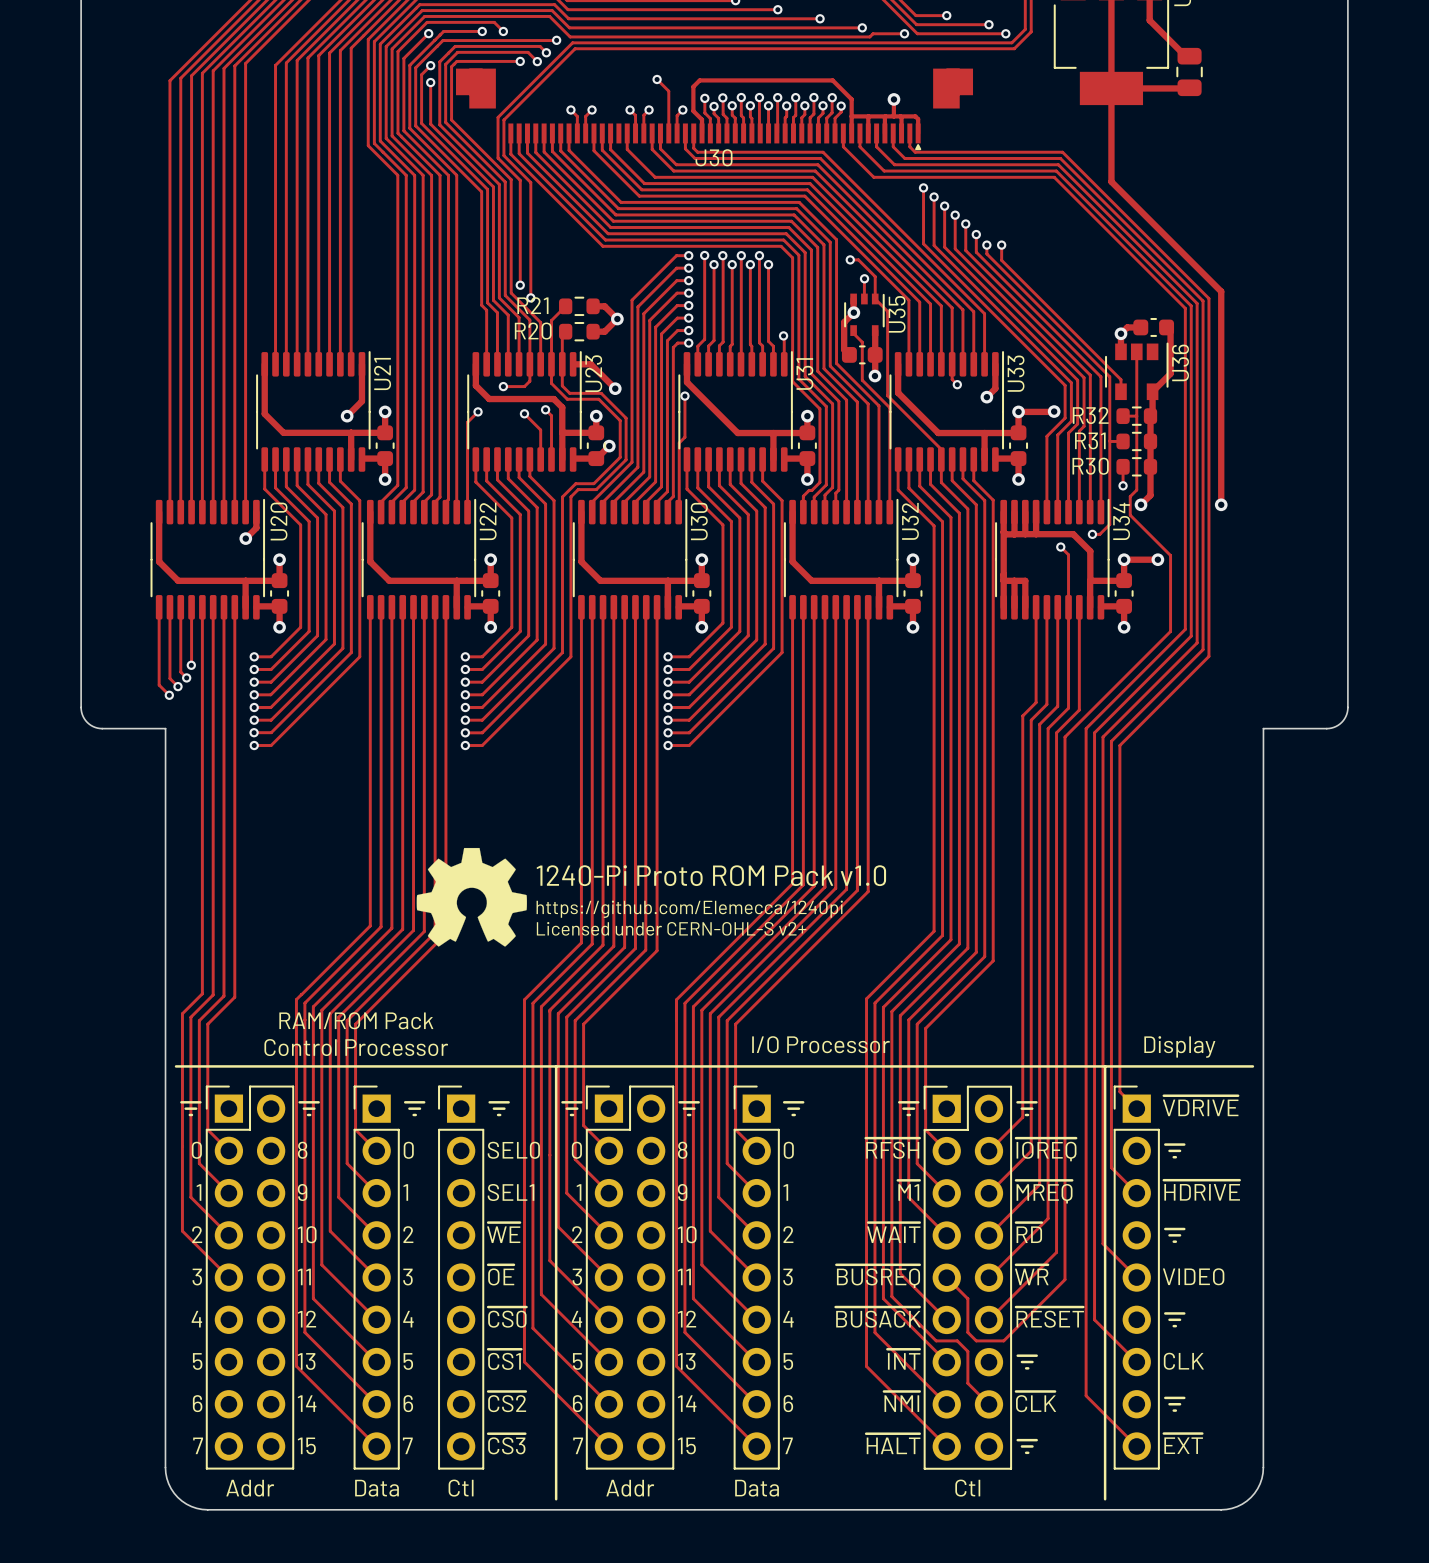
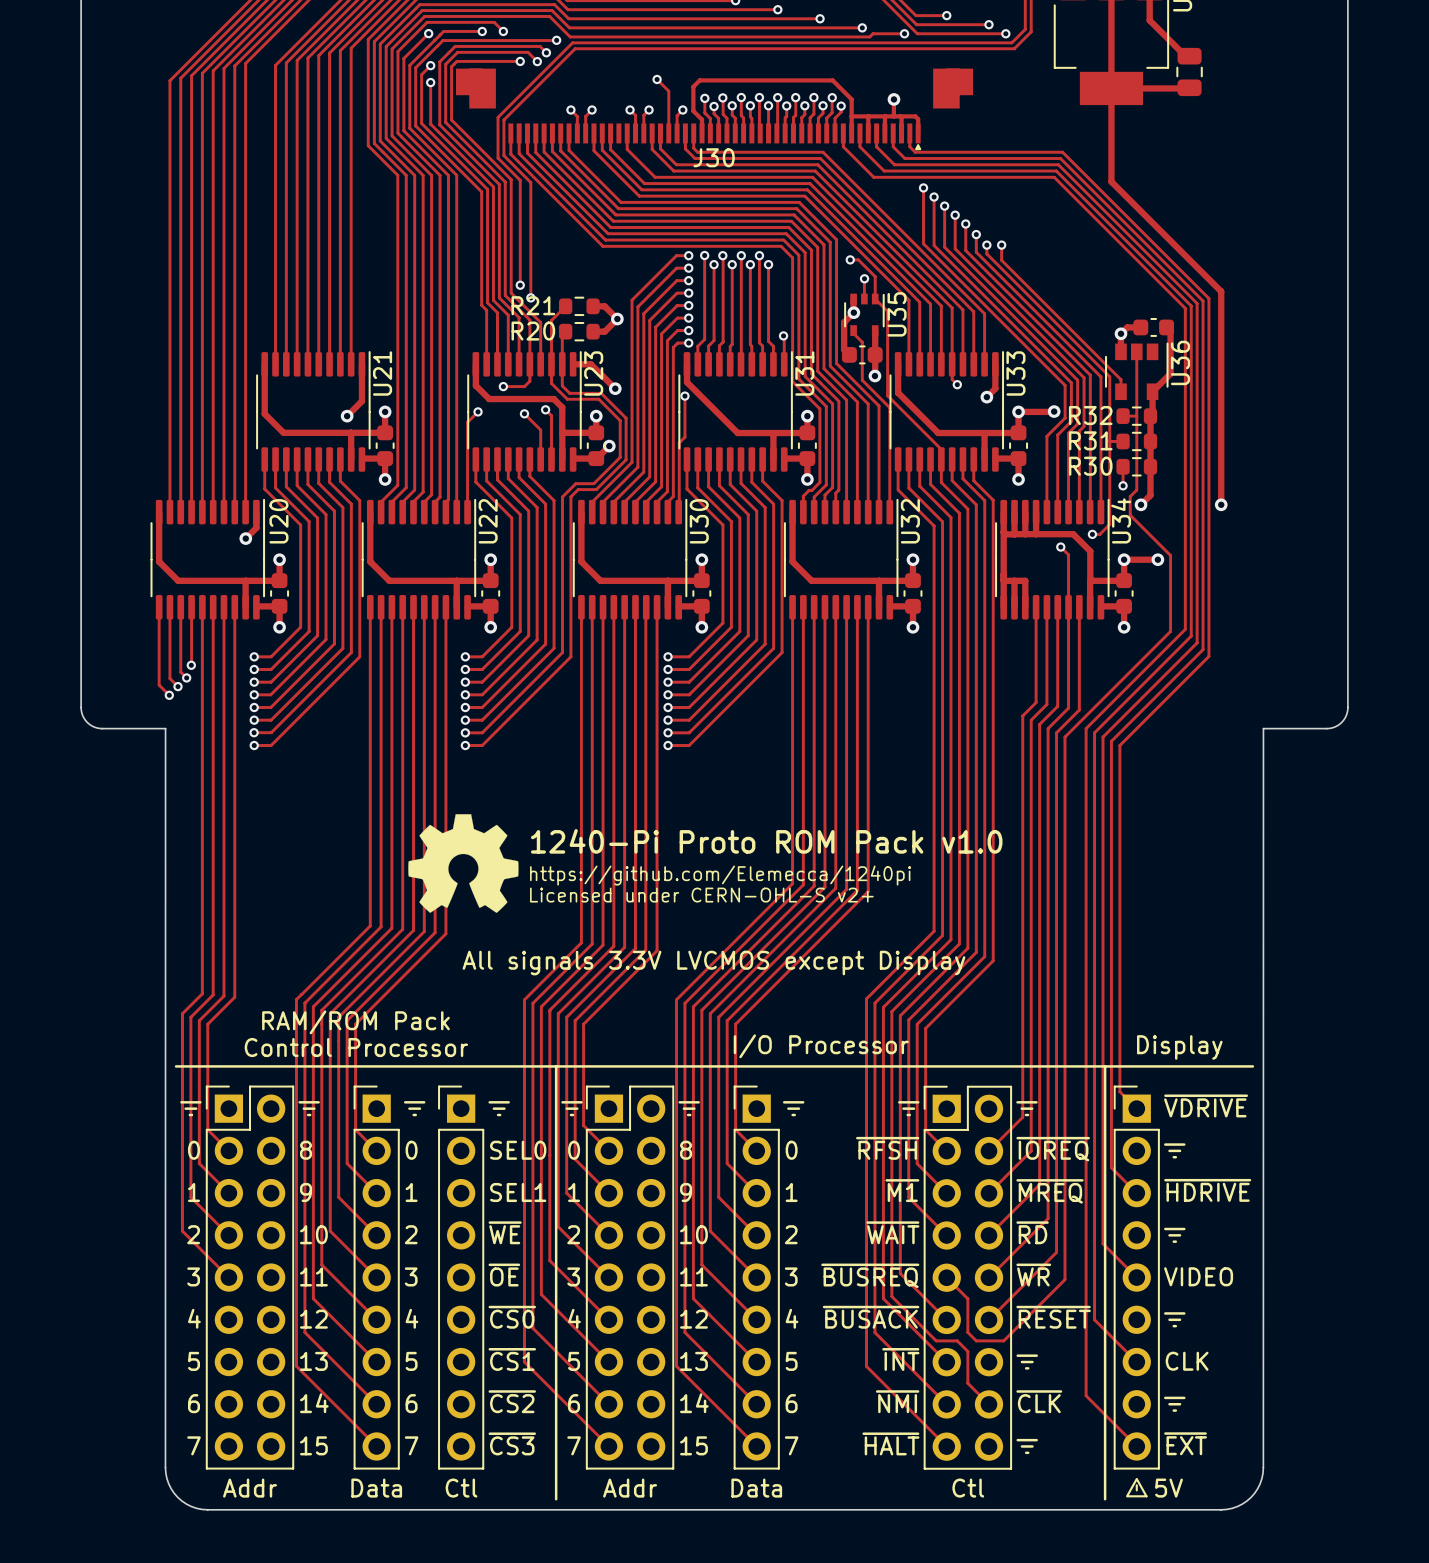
text: none -> 1240-Pi Proto ROM Pack v1.0 (766, 841)
text: 1240-Pi Proto ROM Pack v1.0 (711, 875) -> https://github.com/Elemecca/1240pi (720, 875)
drawing position: (471, 897) -> (463, 863)
text: https://github.com/Elemecca/1240pi (689, 909) -> none
text position: Licensed under CERN-OHL-S v2+ (671, 928) -> Licensed under CERN-OHL-S v2+ (701, 895)
text: none -> All signals 3.3V LVCMOS except Display (714, 963)
drawing: none -> [1126, 1477, 1148, 1498]
text: none -> 5V (1169, 1488)

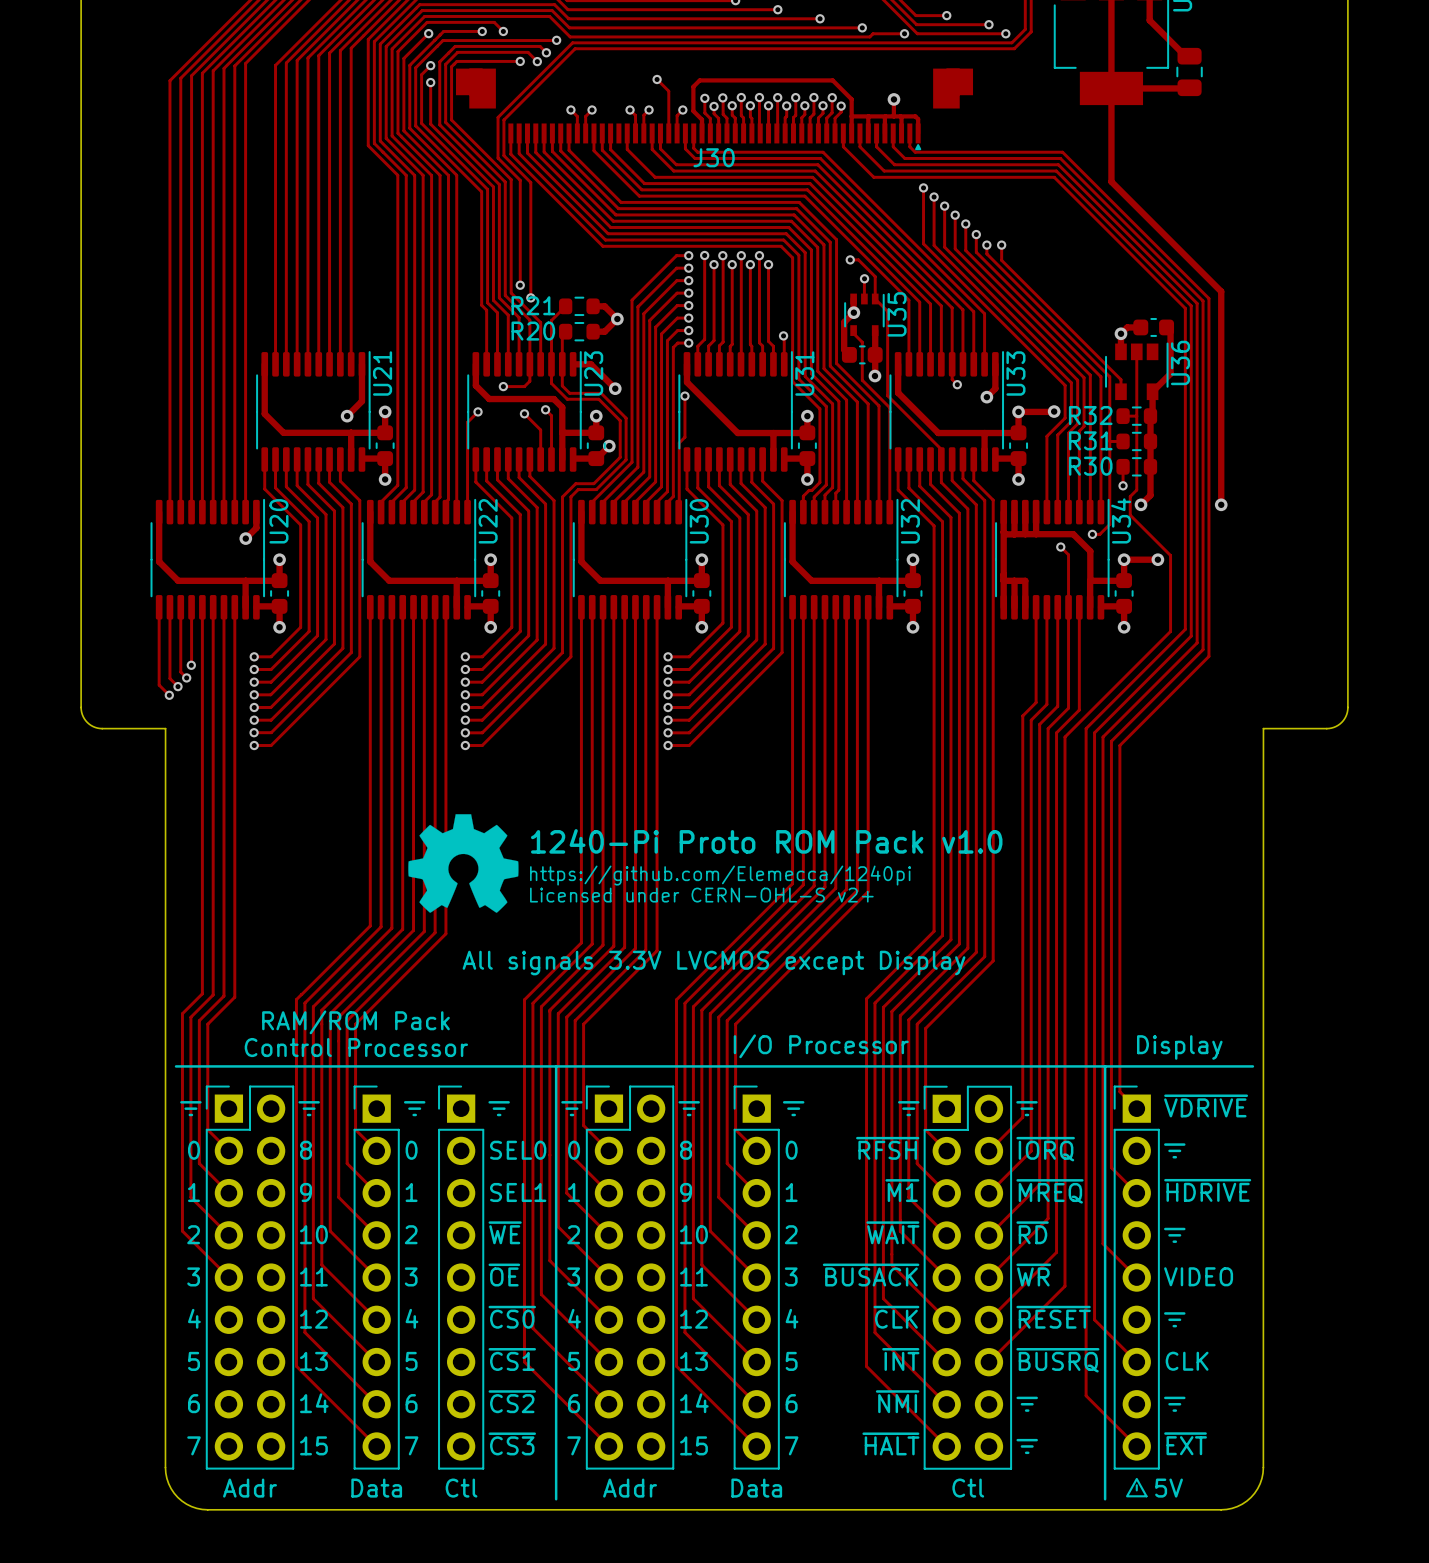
text: ~{IOREQ} (1053, 1149) -> ~{IORQ} (1045, 1149)
track: (900, 1231) (900, 1273) -> (891, 1265) (900, 1273)
track: (891, 1265) (891, 1296) (936, 1340) (957, 1340) (967, 1351) (967, 1383) (988, 1404) -> none
text: ~{BUSREQ} (870, 1275) -> ~{BUSACK} (871, 1275)
track: (946, 1277) (967, 1298) -> (946, 1277) (900, 1231)
track: (1064, 1279) (1003, 1340) (976, 1340) (967, 1332) (967, 1298) -> (1064, 1279) (1064, 1286) (988, 1362)
text: ~{BUSACK} (871, 1317) -> ~{CLK} (896, 1317)
line: (1017, 1355) (1036, 1355) -> (1017, 1397) (1036, 1397)
text: none -> ~{BUSRQ} (1057, 1360)
line: (1021, 1362) (1032, 1362) -> (1021, 1404) (1032, 1404)
line: (1026, 1368) (1028, 1368) -> (1026, 1410) (1028, 1410)
text: ~{CLK} (1039, 1401) -> none

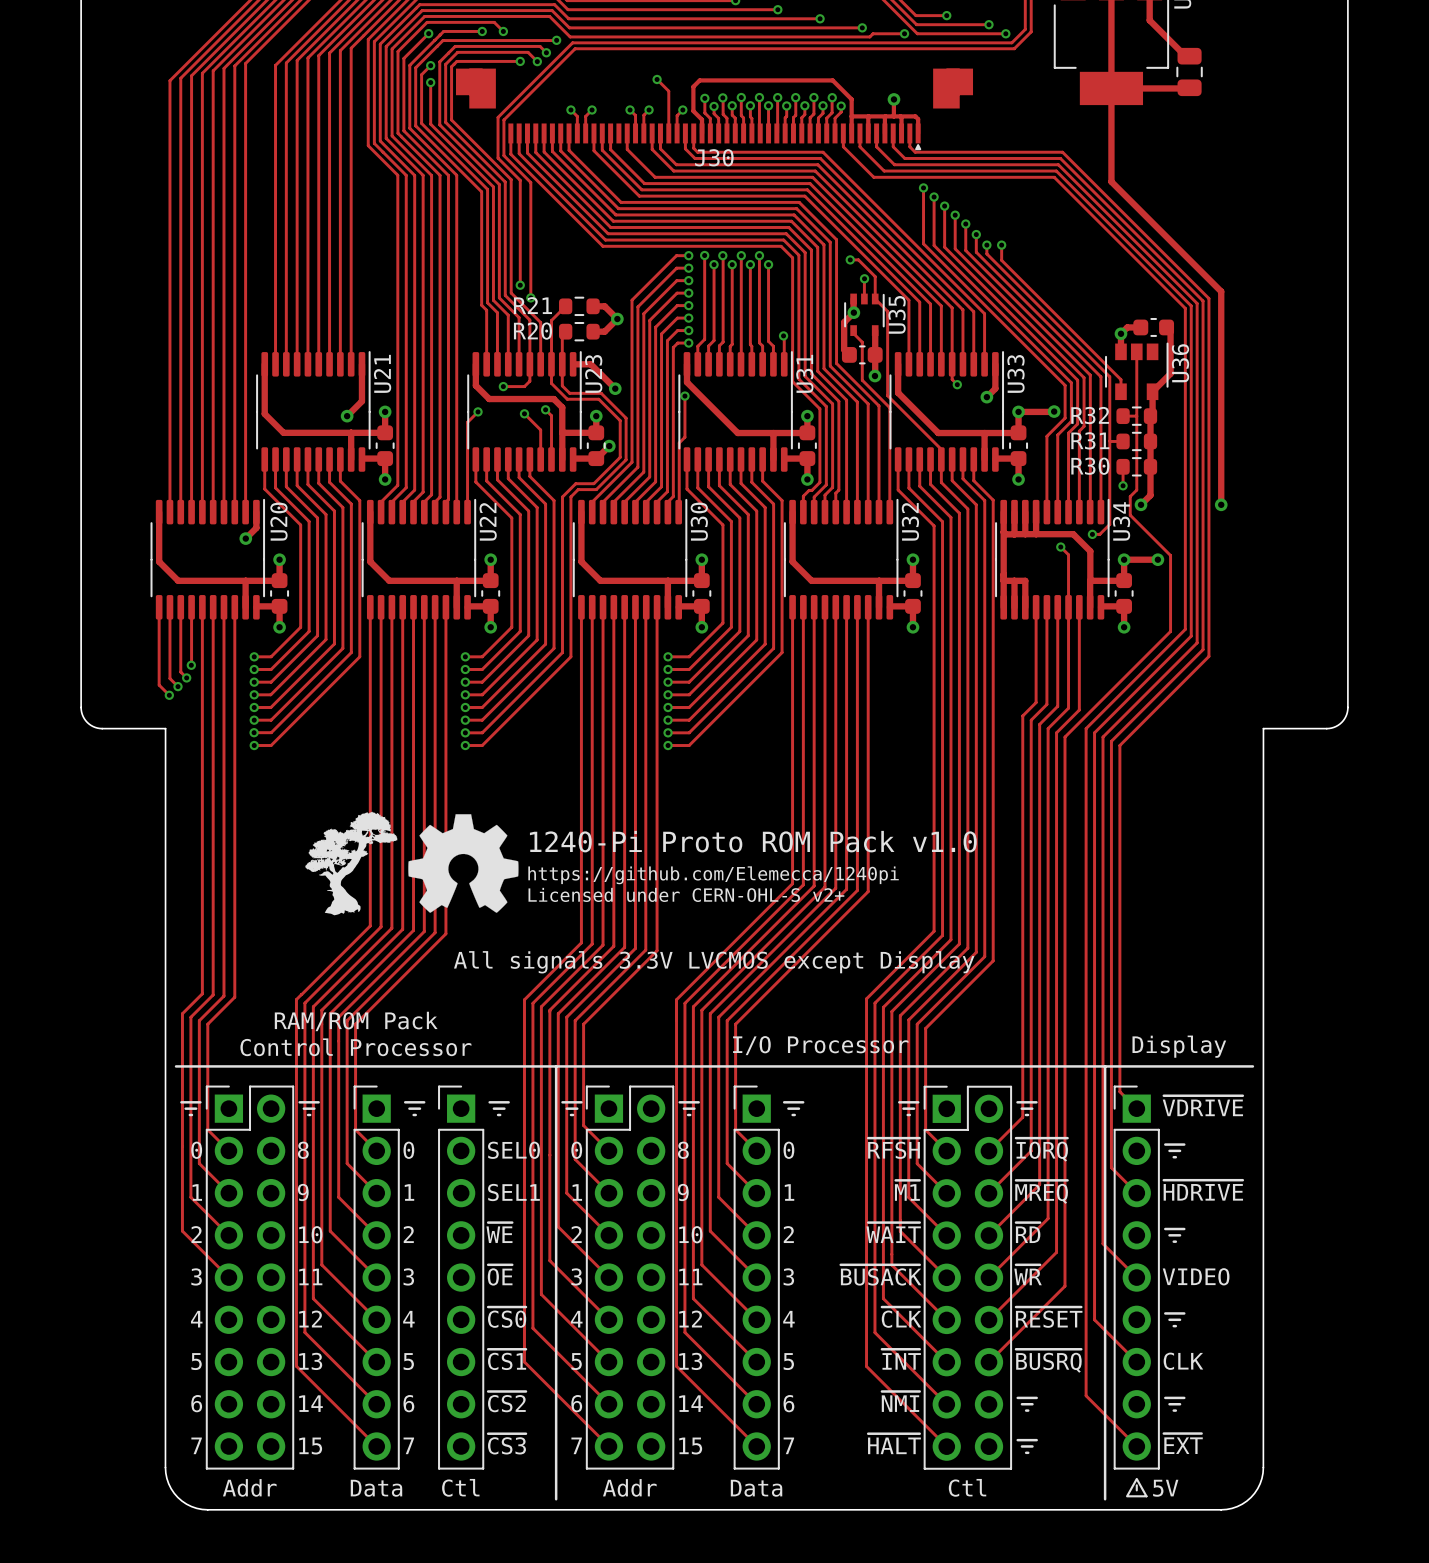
drawing: none -> [305, 811, 398, 916]

